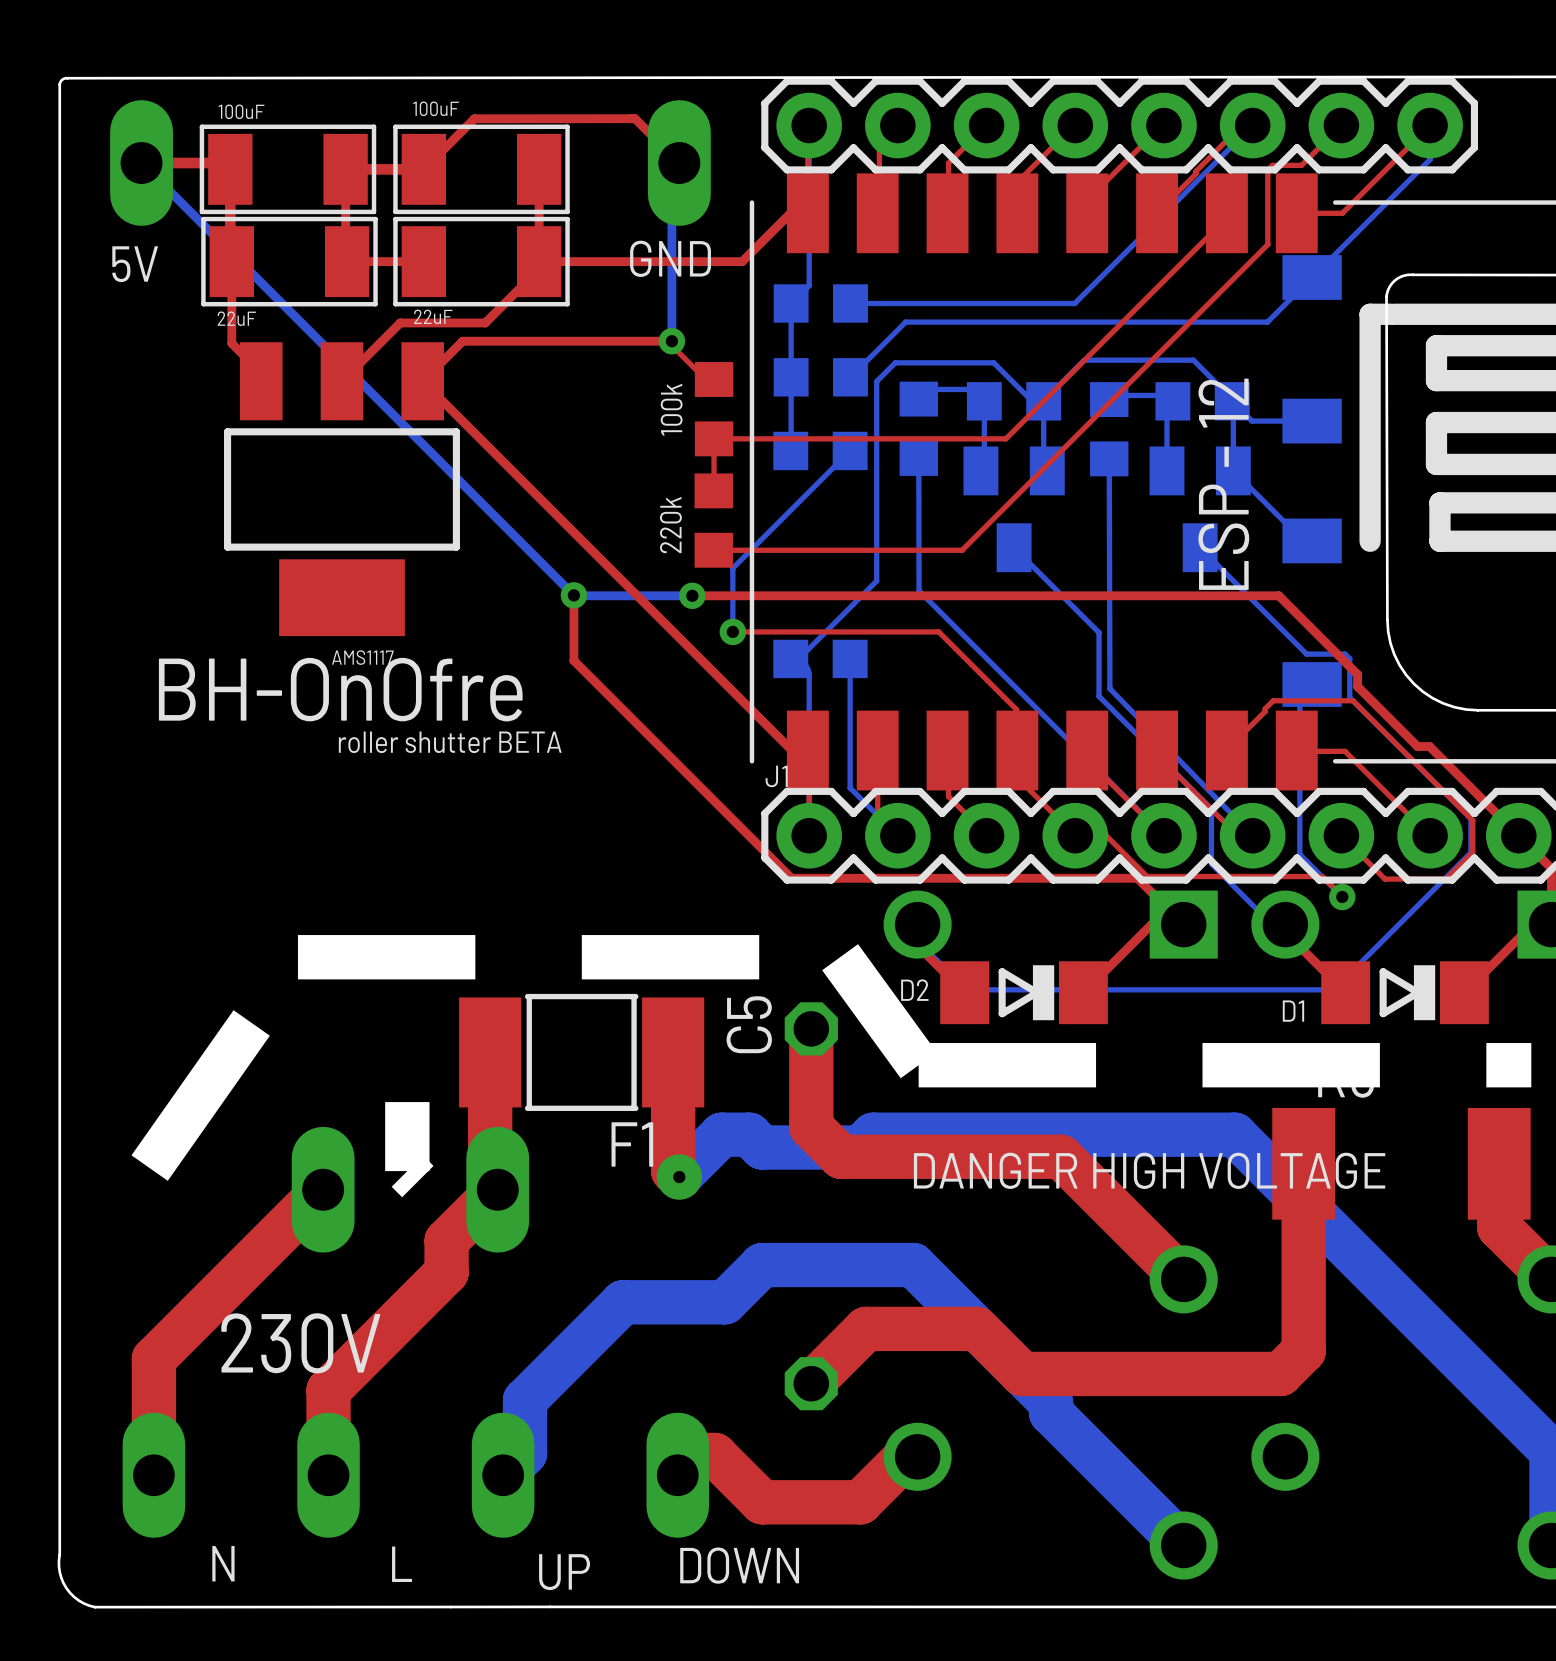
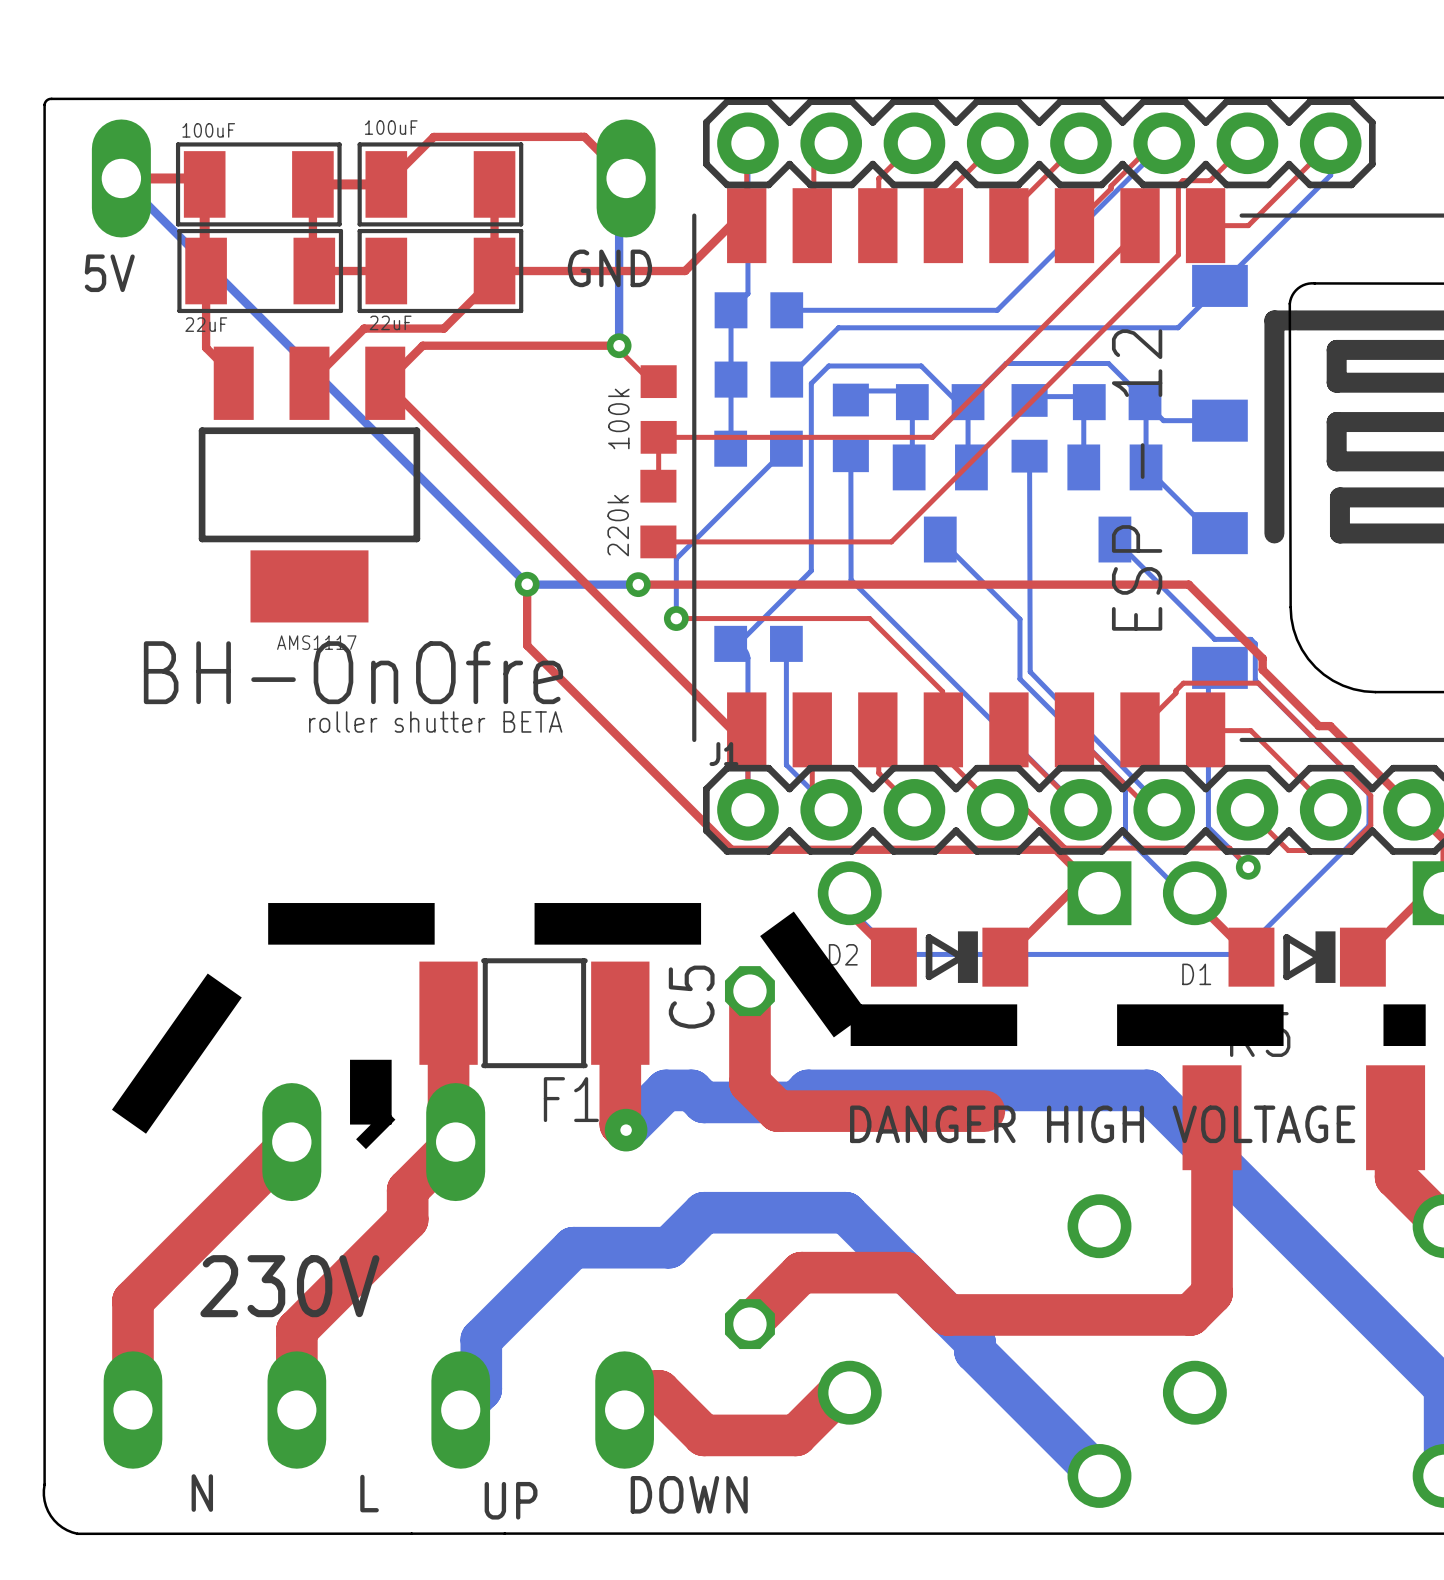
top track: (1061, 1156) (1183, 1279) -> none

